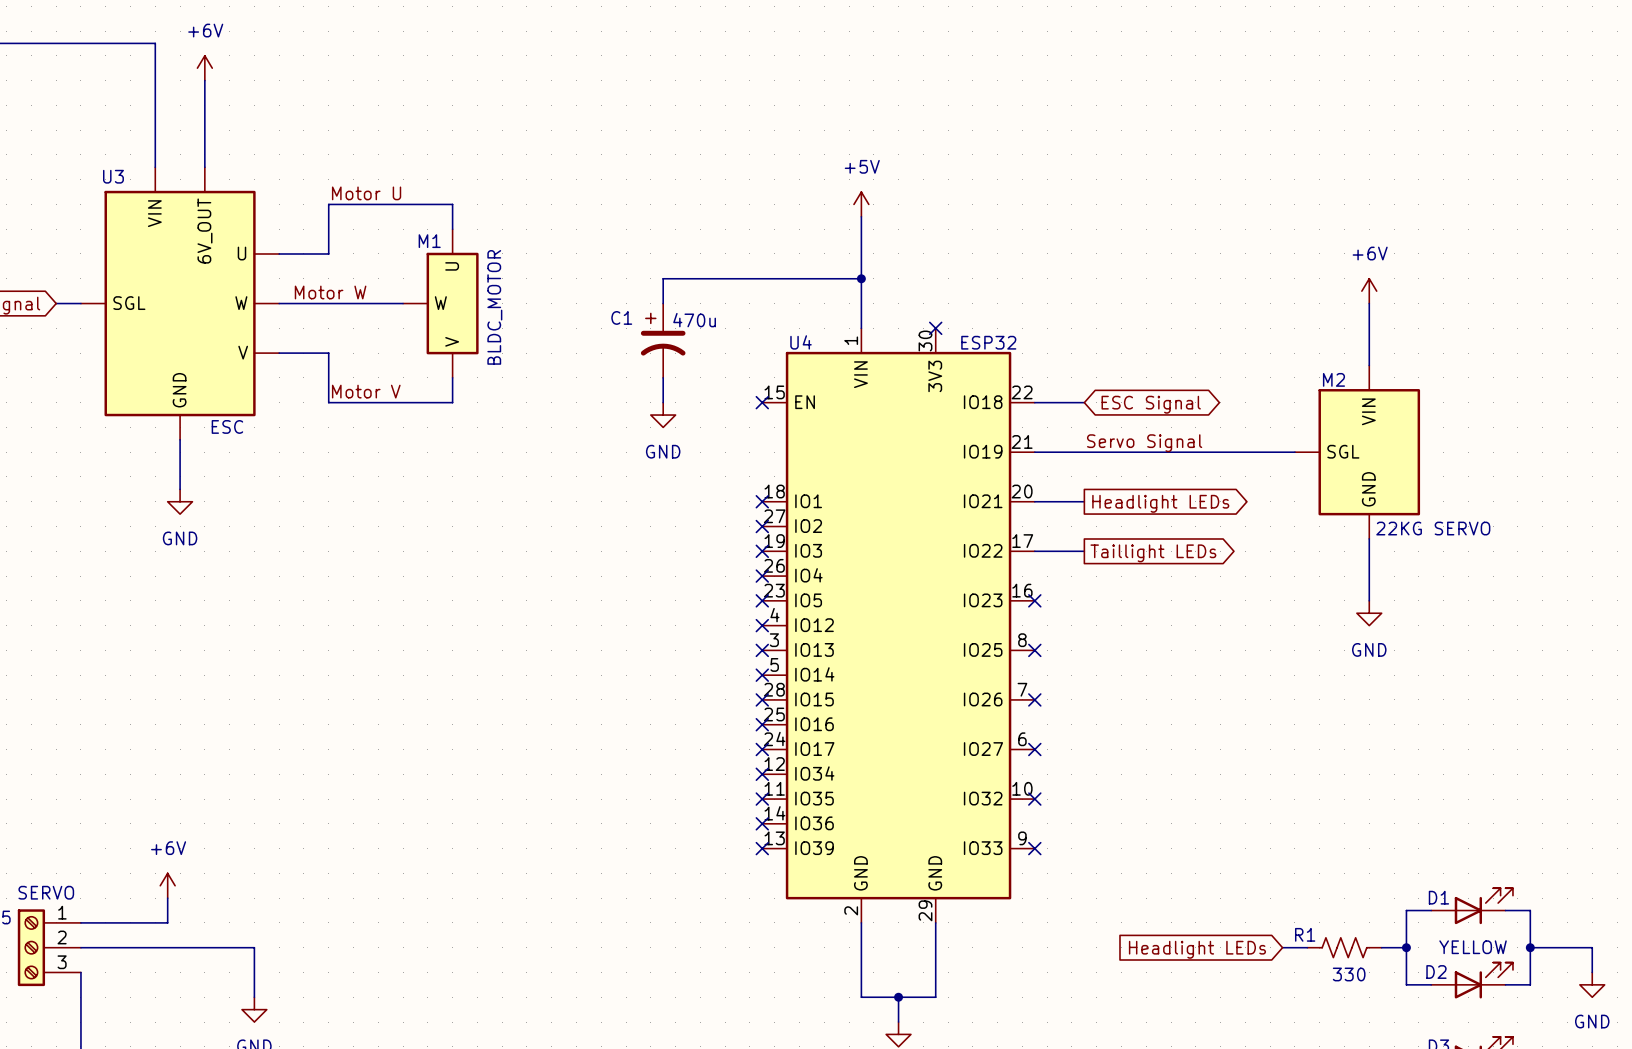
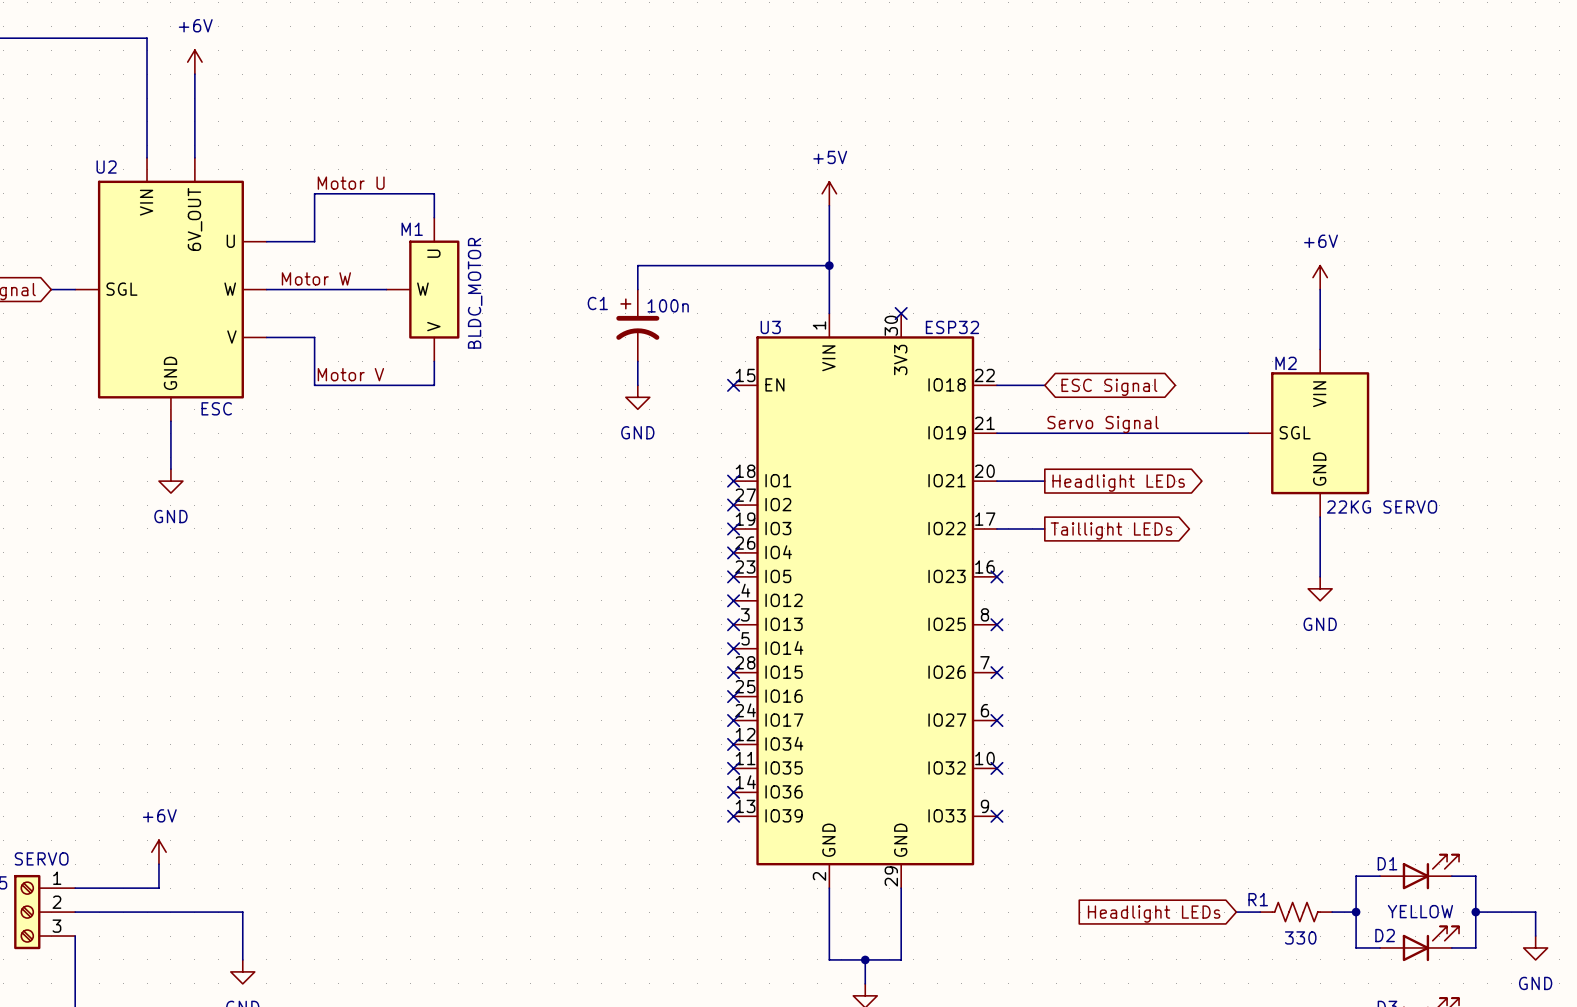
U3 name: U3 (113, 176) -> U2 (106, 167)
C1 value: 470u (694, 320) -> 100n (668, 305)
U4 name: U4 (801, 342) -> U3 (770, 327)

